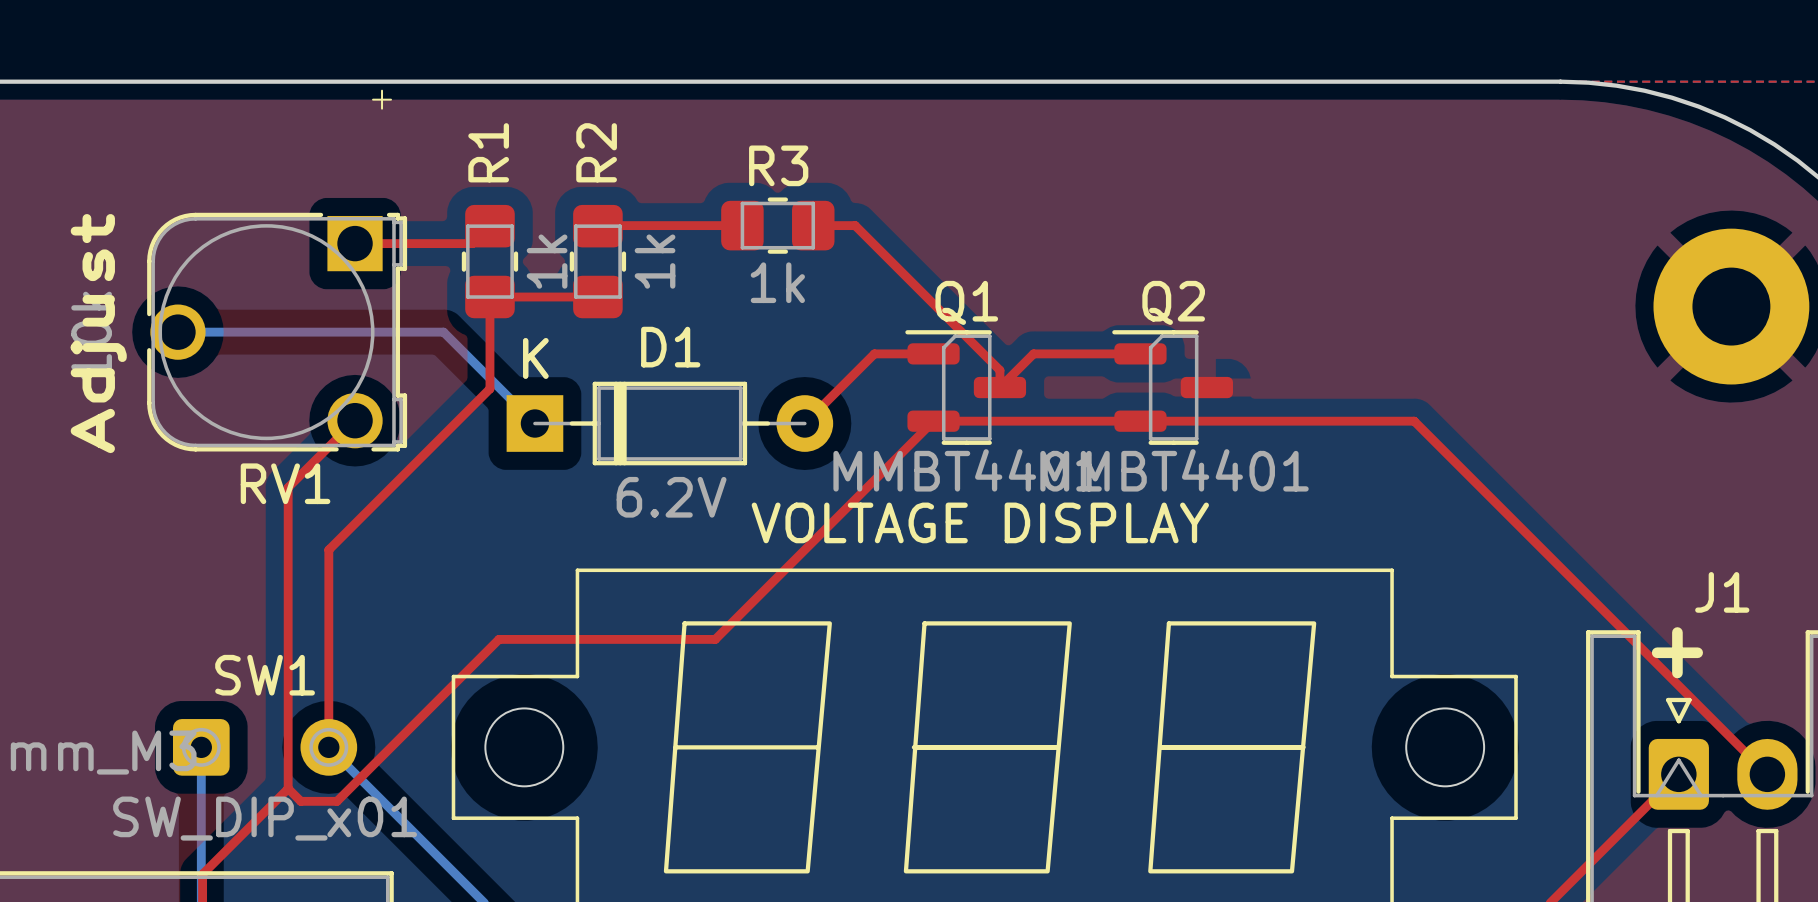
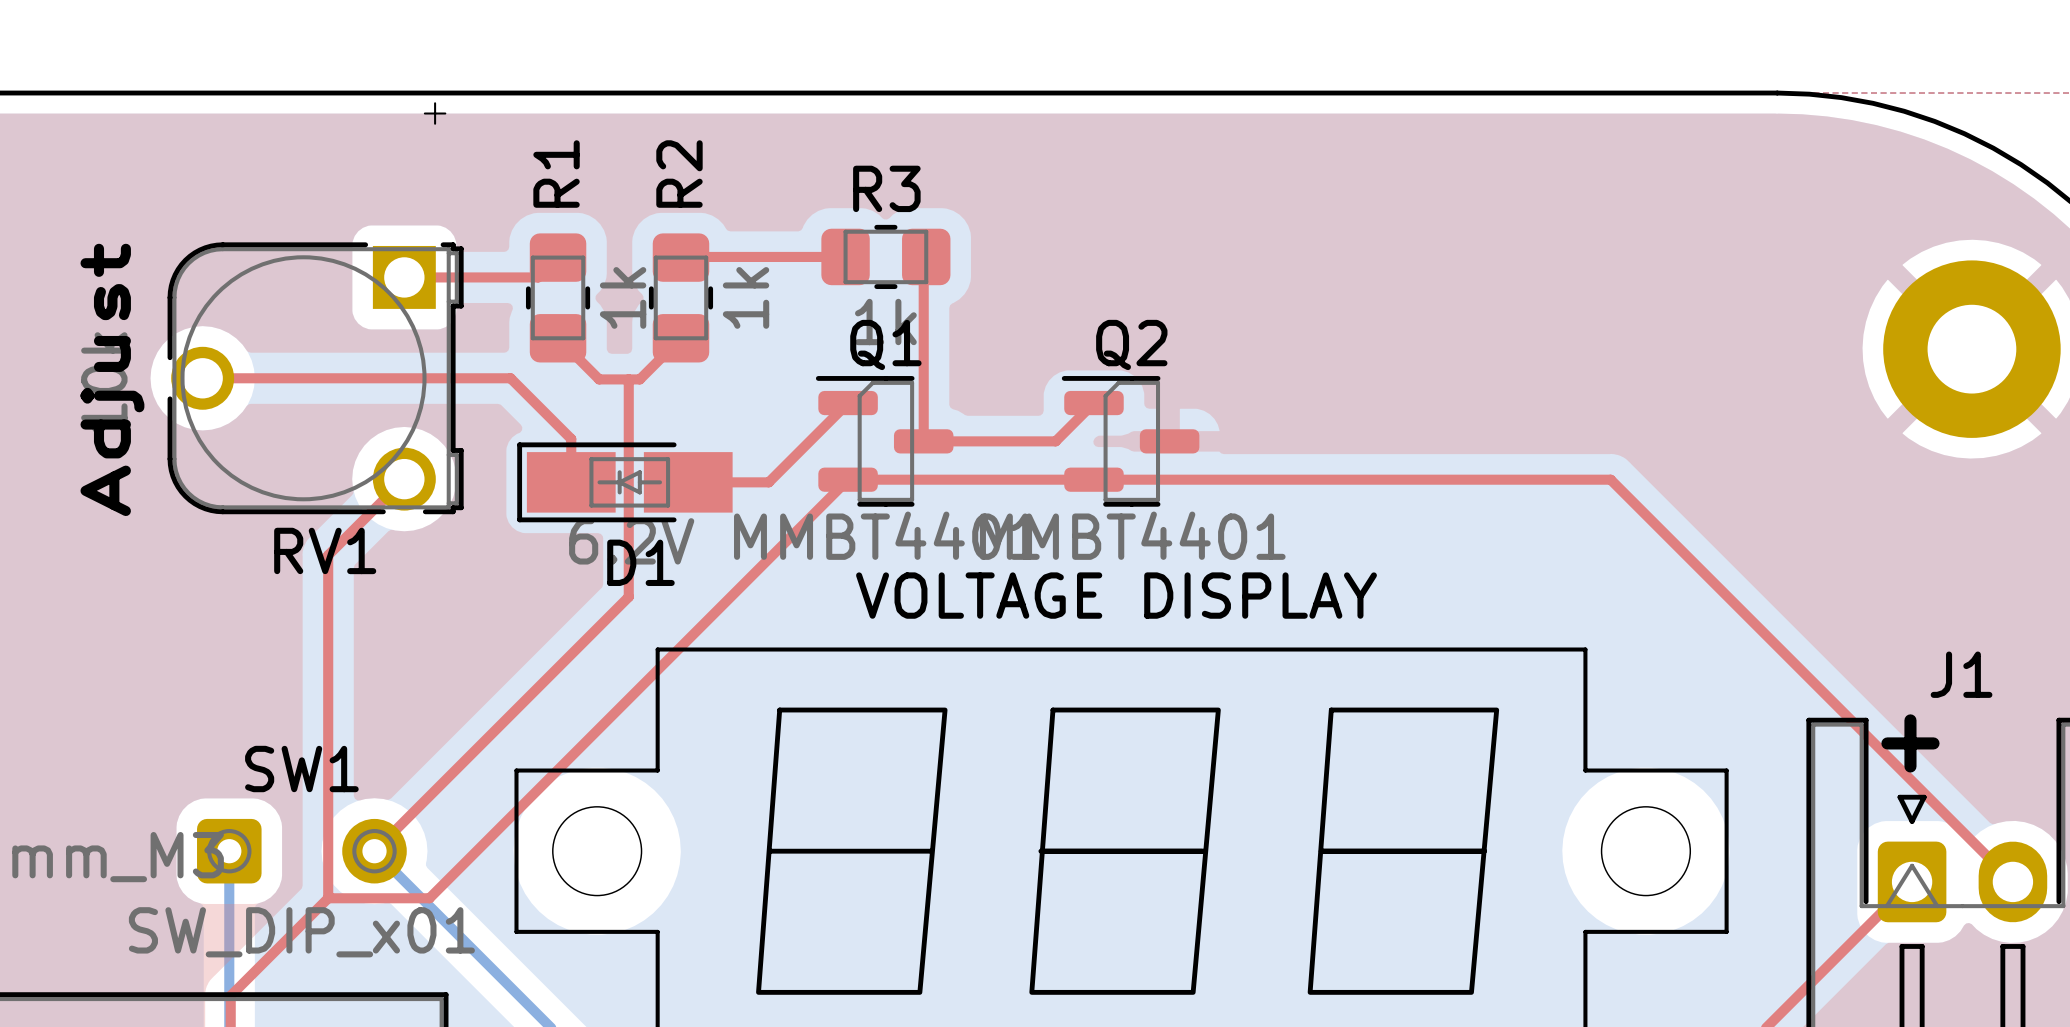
top track: (813, 225) (855, 225) (999, 370) (999, 387) (1033, 353) (1140, 353) -> (926, 256) (923, 259) (923, 441) (1055, 441) (1093, 403)
top track: none -> (558, 338) (599, 379) (639, 379) (680, 338)
top track: (597, 297) (489, 297) (489, 388) (328, 549) (328, 747) -> (628, 379) (628, 596) (374, 851)
top track: none -> (202, 378) (510, 378) (571, 438) (571, 482)
bottom track: (177, 332) (443, 332) (534, 423) -> none
D1 name position: D1 (670, 347) -> D1 (640, 562)
top track: none -> (848, 403) (768, 482) (688, 482)
top track: (933, 353) (874, 353) (804, 423) -> none
D1 footprint: [506, 381, 834, 466] -> [517, 442, 733, 523]
Q1 position: (965, 387) -> (884, 441)
Q2 position: (1172, 387) -> (1130, 441)
top track: (933, 421) (715, 639) (498, 639) (337, 801) (300, 801) (288, 788) -> (1063, 479) (848, 479) (429, 898) (328, 898)

